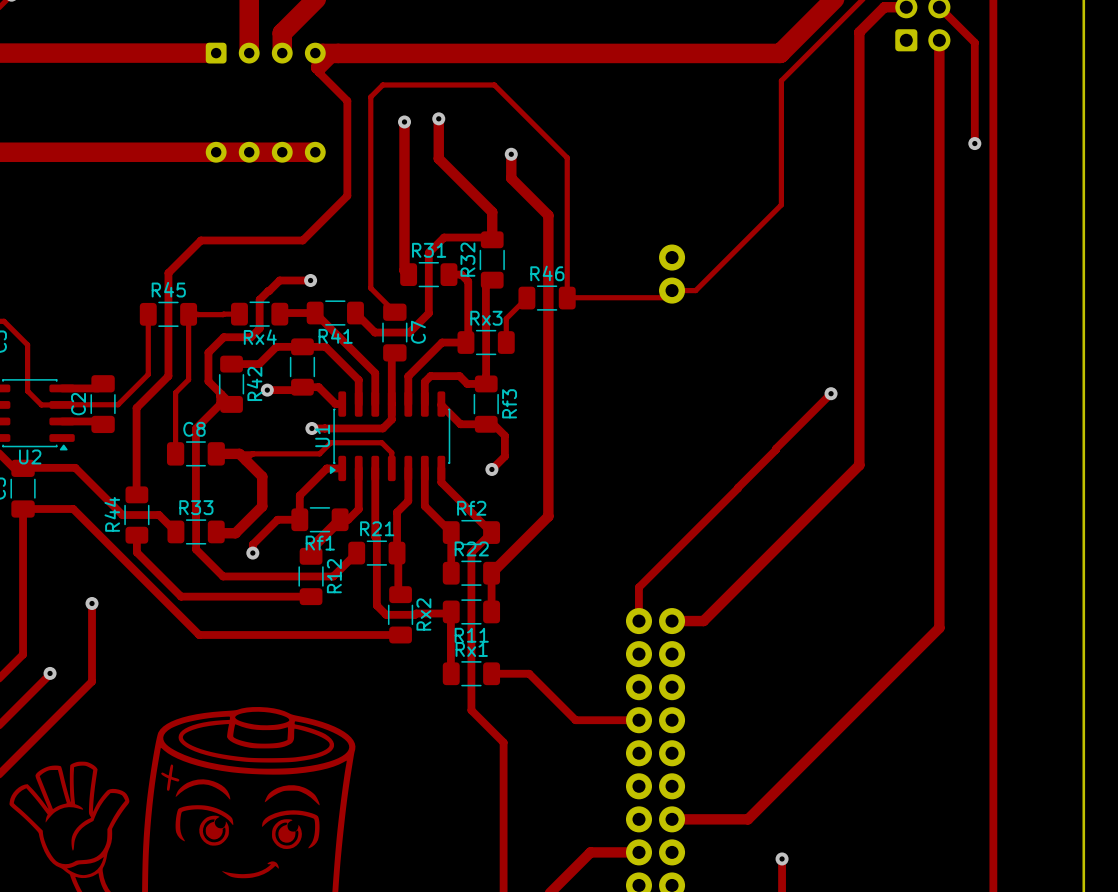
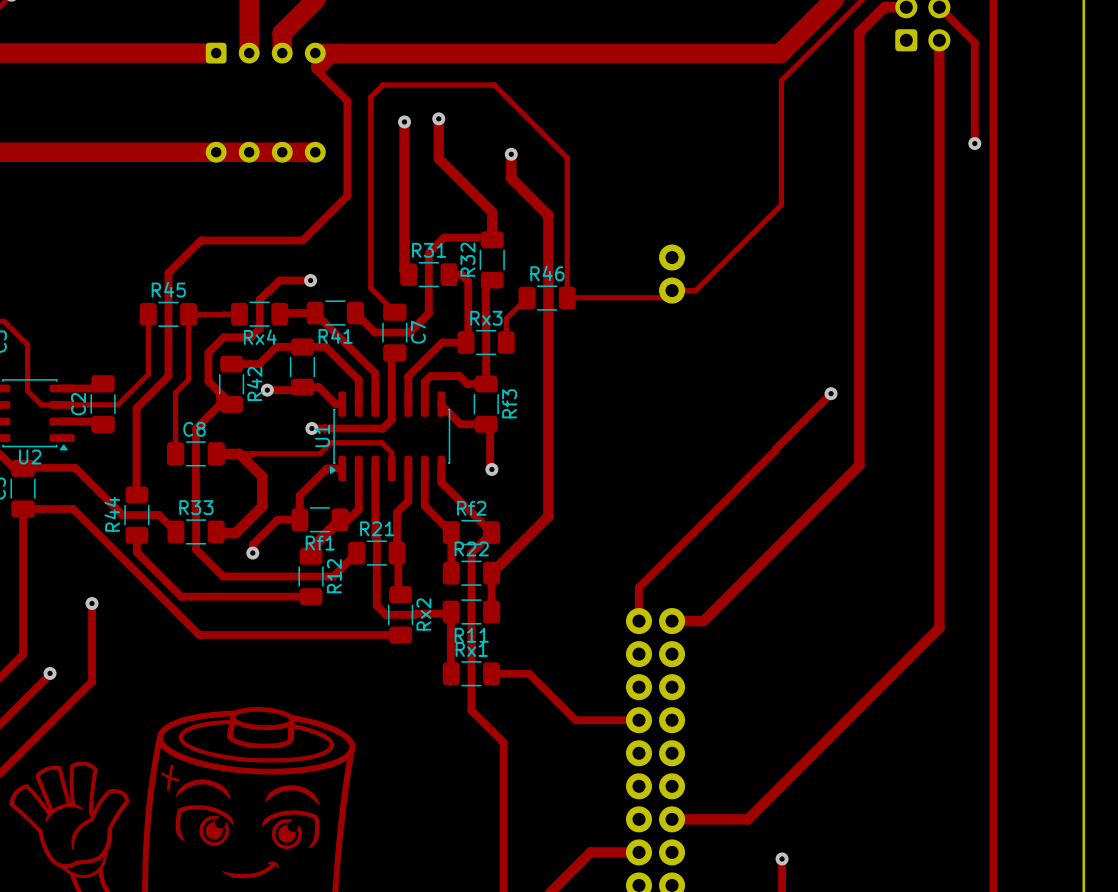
track: none -> (486, 424) (490, 428) (490, 471)
track: (493, 424) (504, 435) (504, 456) (491, 469) -> none

